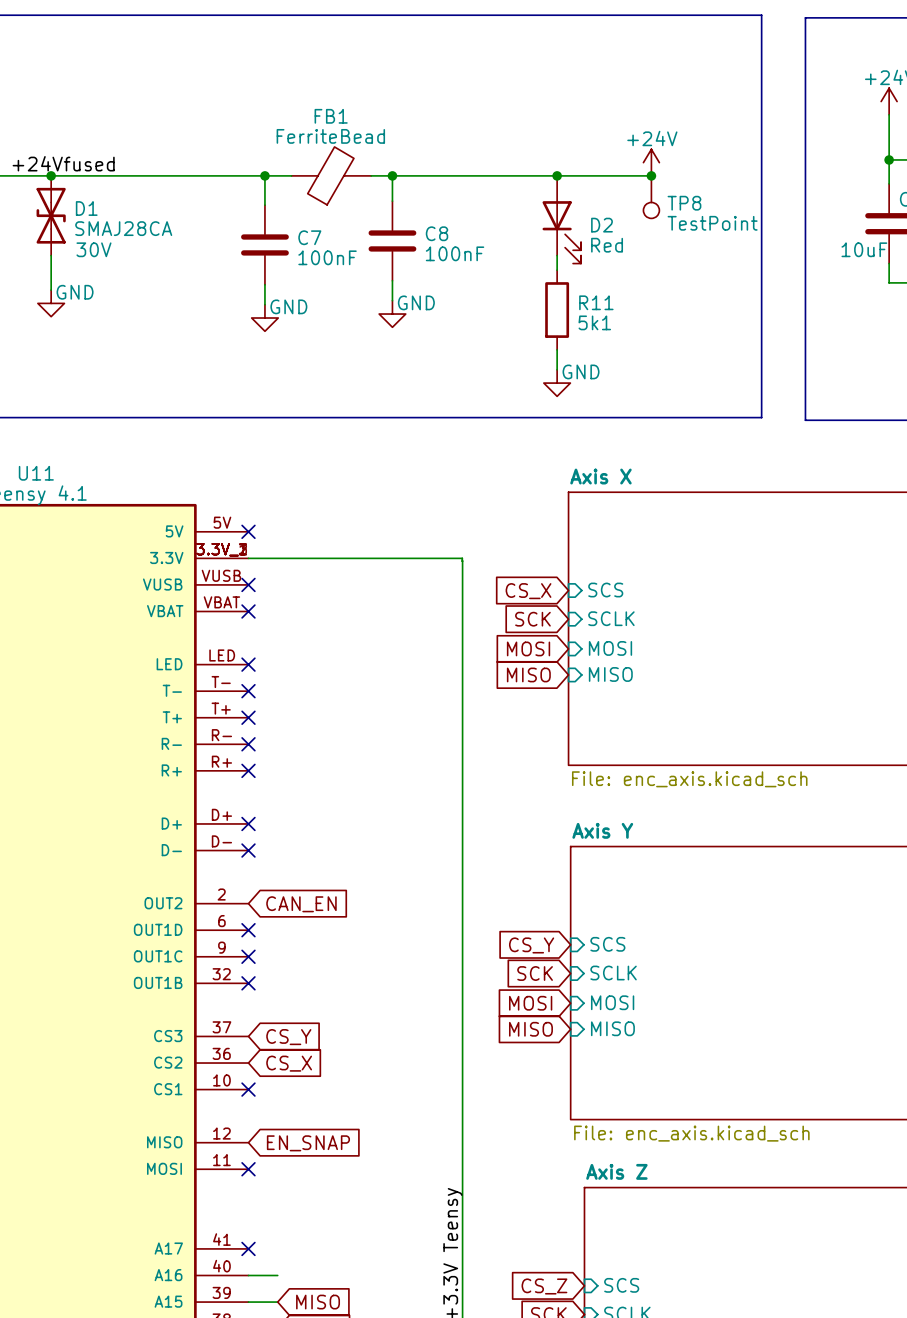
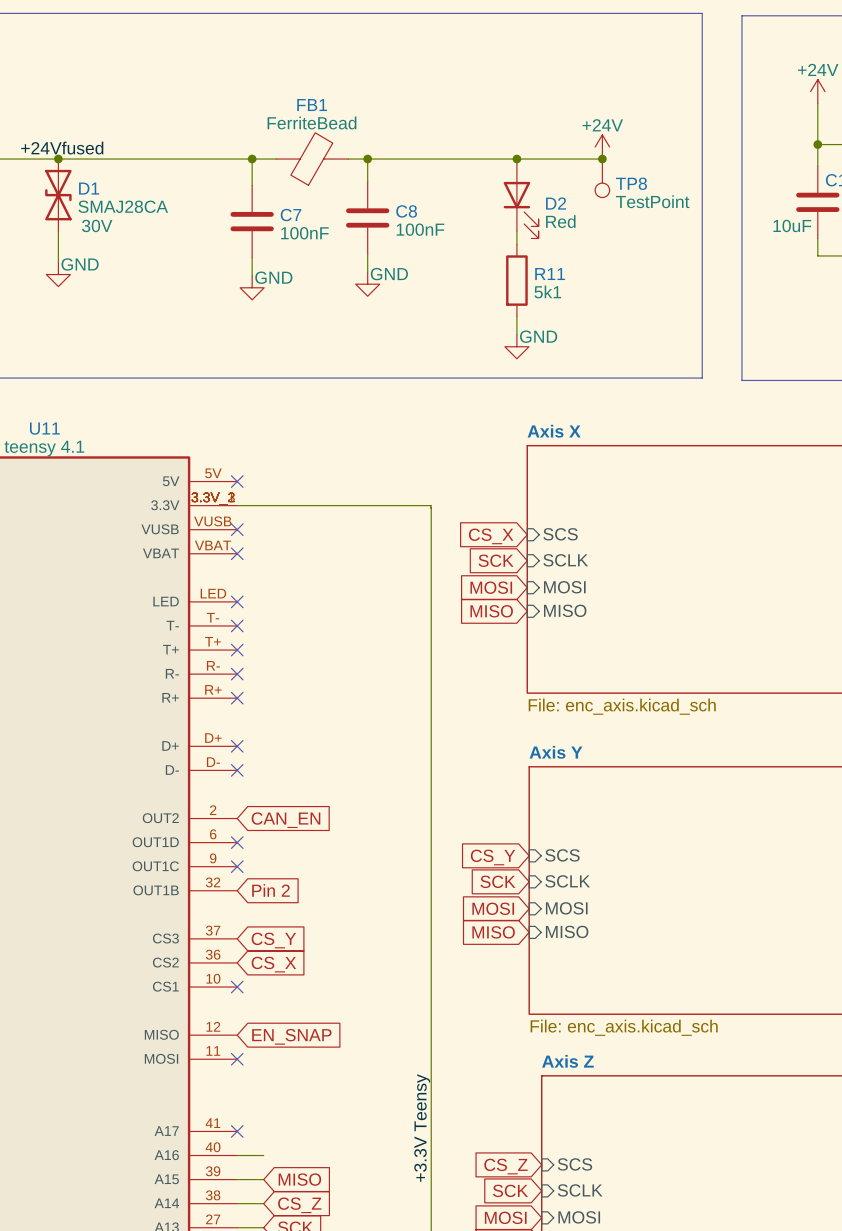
no-connect mark: (248, 983) -> none
global label: none -> Pin 2 (270, 890)

